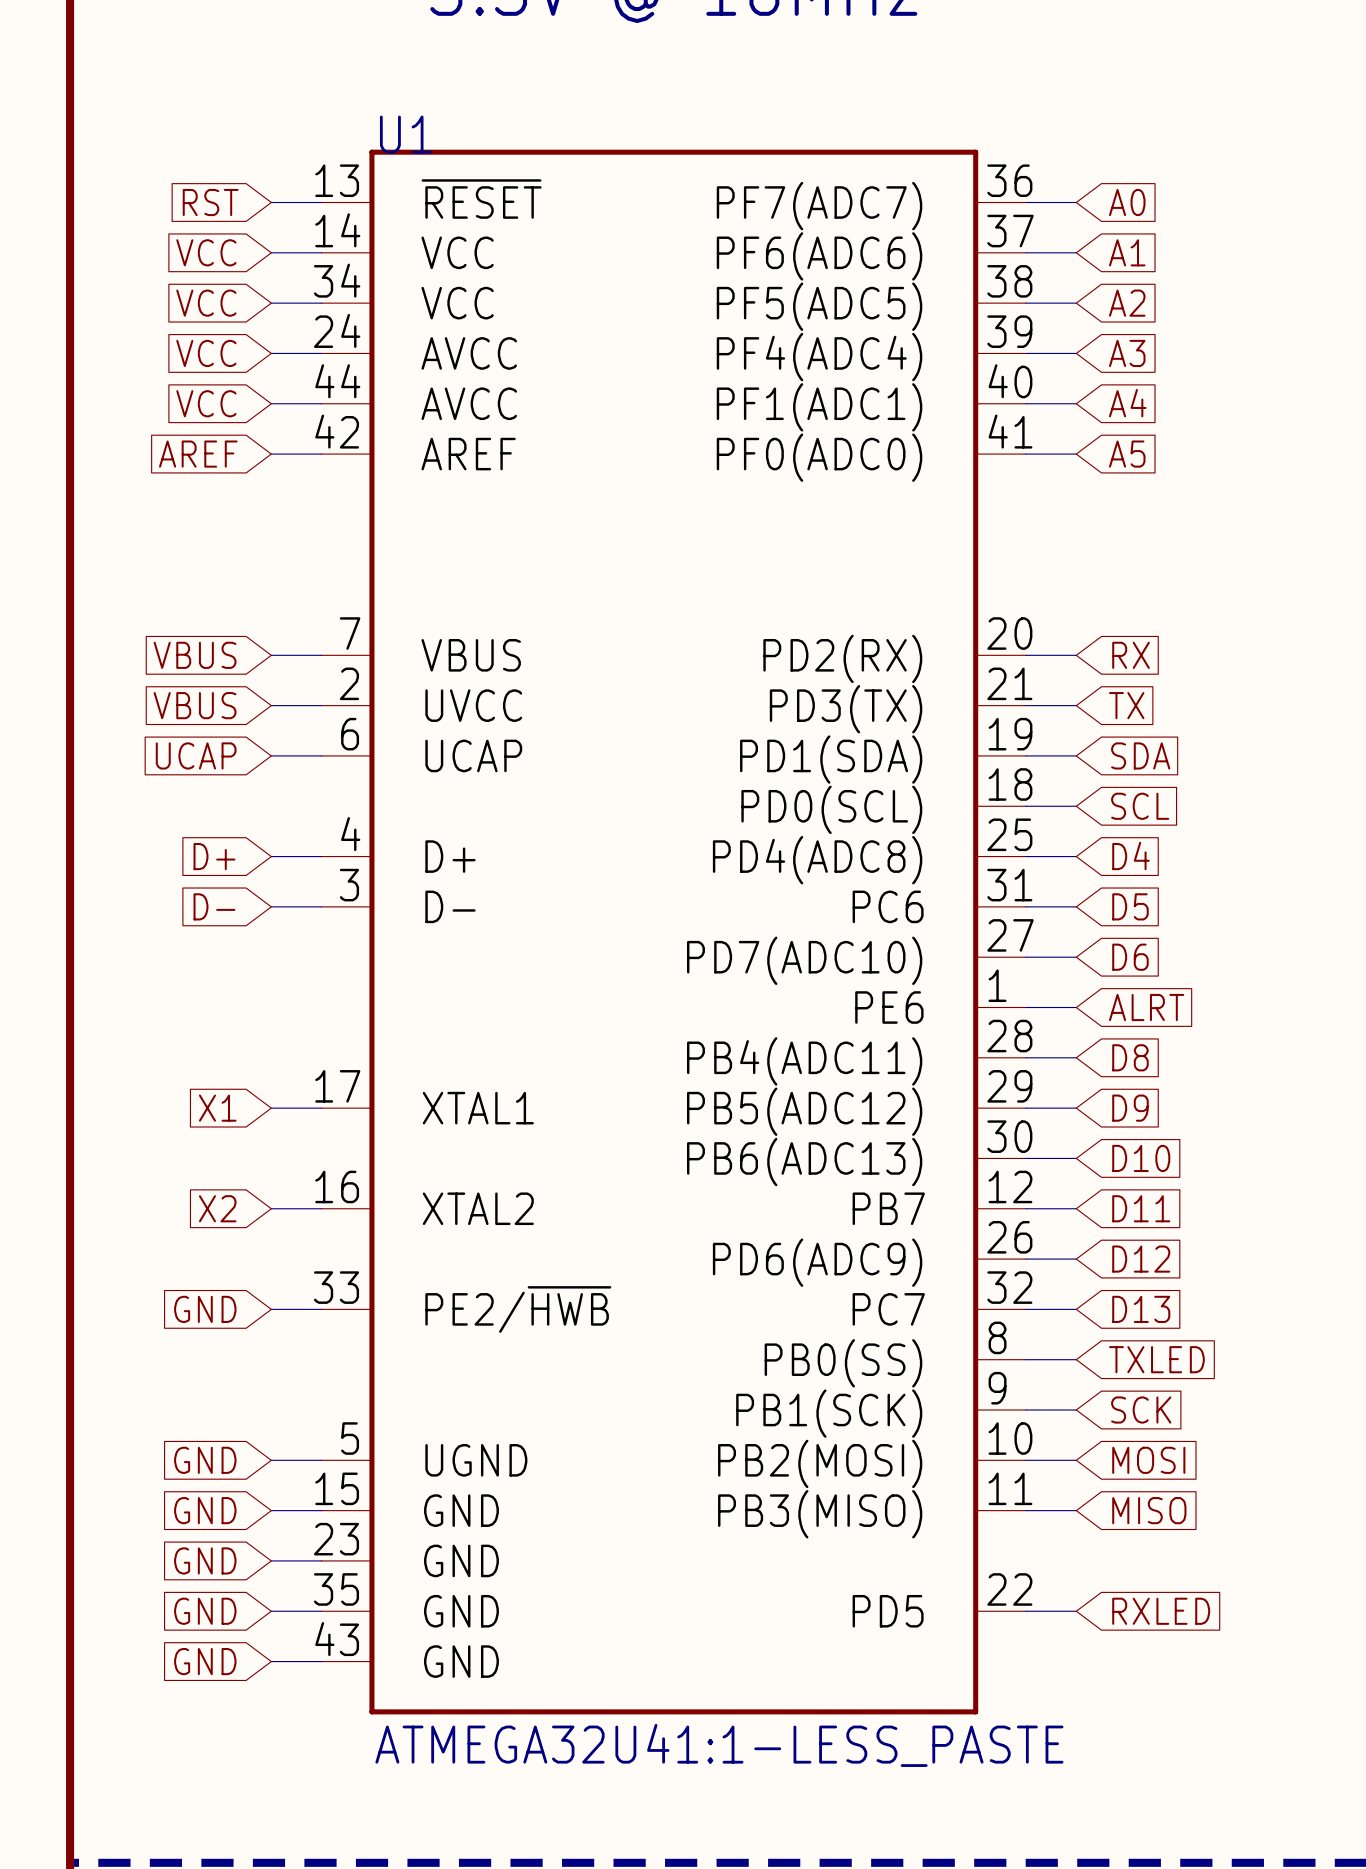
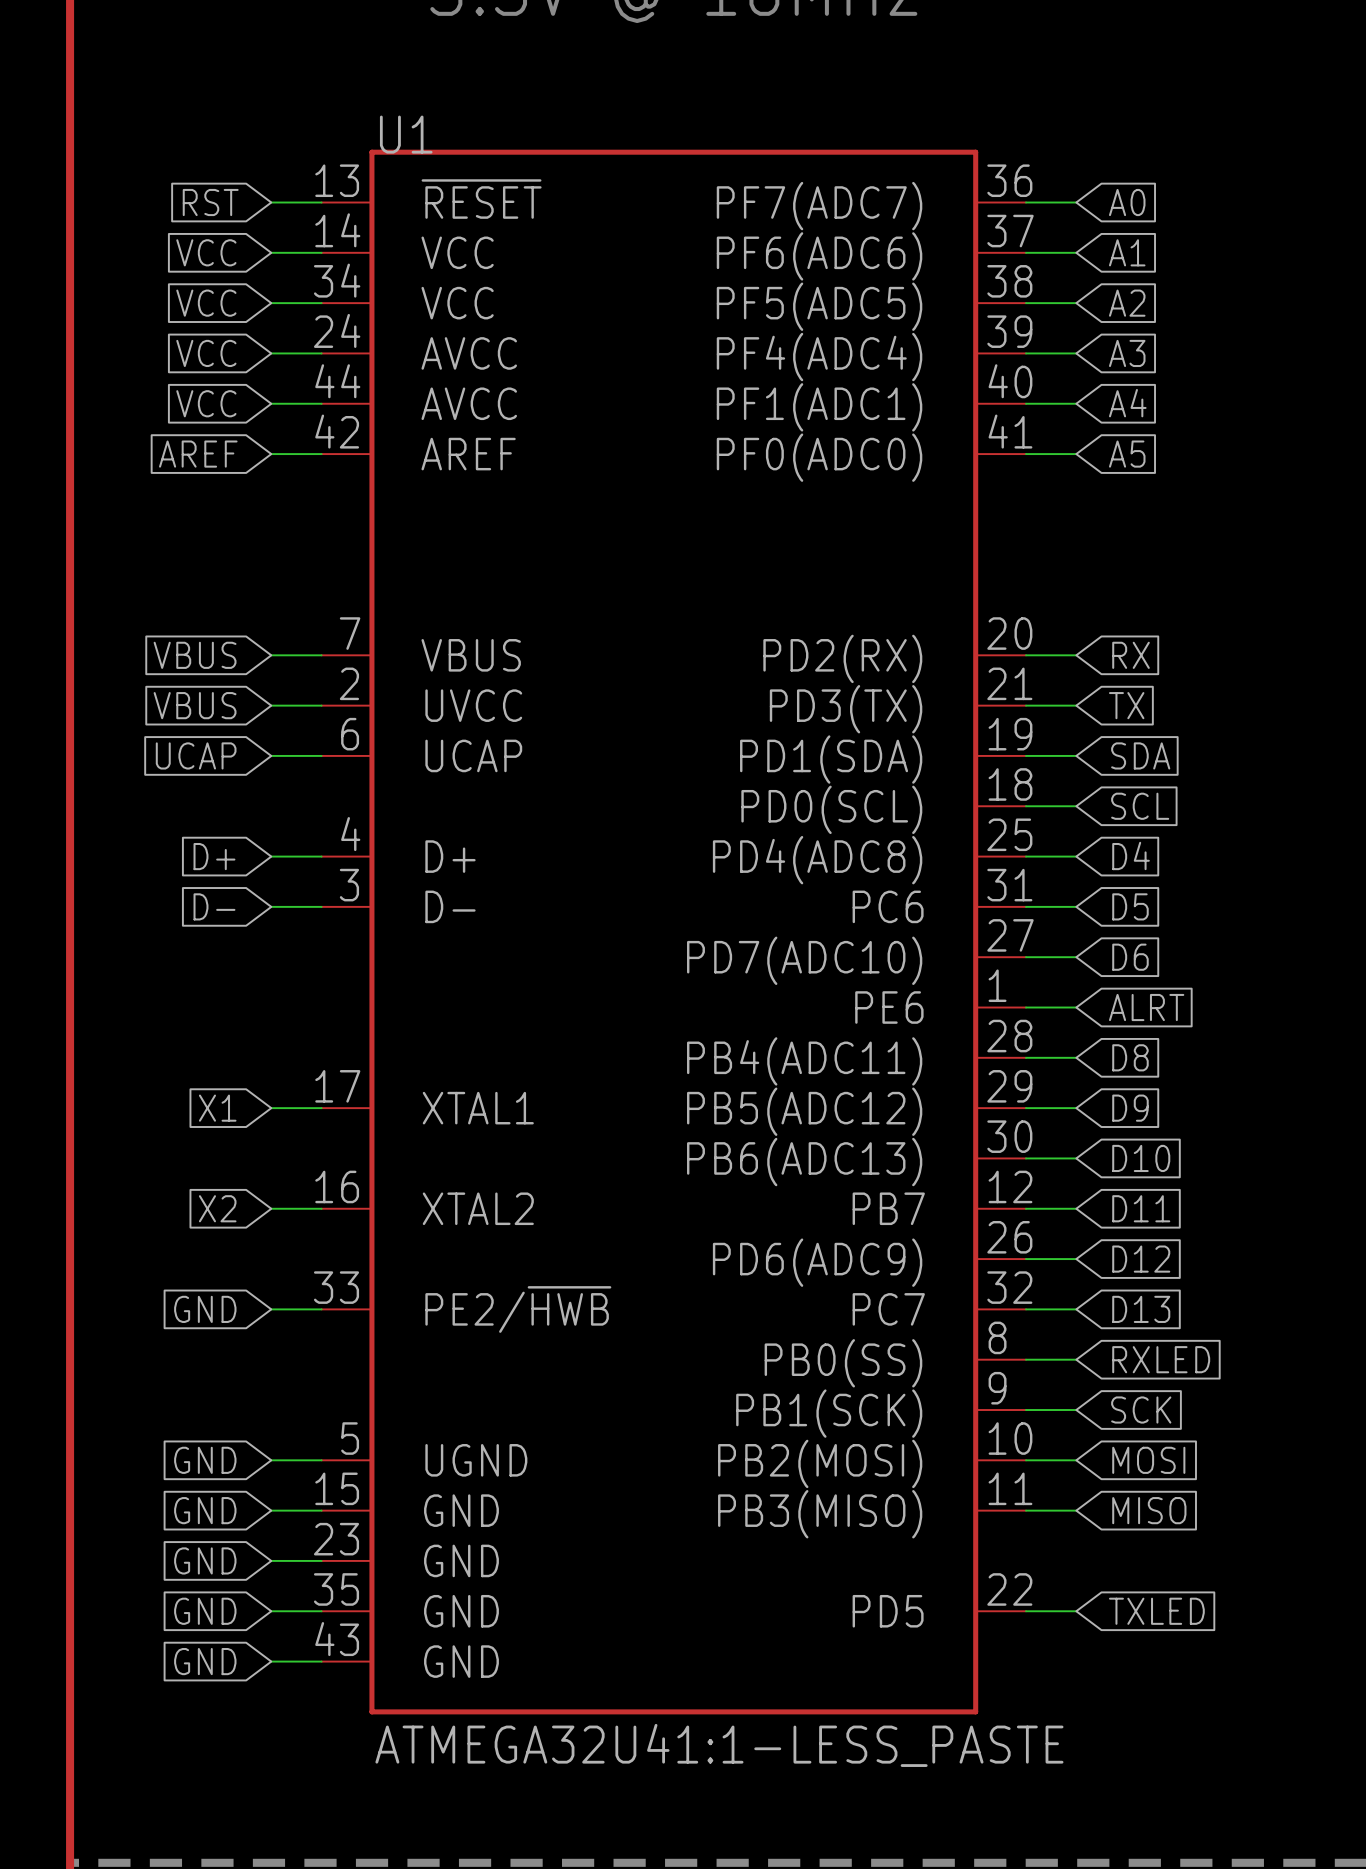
global label: TXLED (1156, 1359) -> RXLED (1161, 1359)
global label: RXLED (1161, 1611) -> TXLED (1156, 1611)

